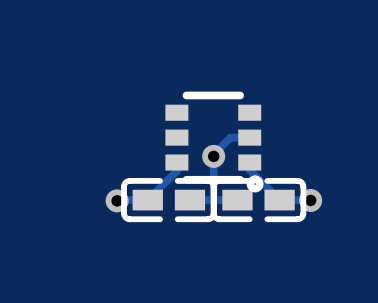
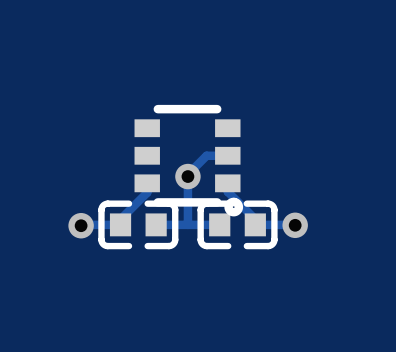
part footprint: [121, 178, 217, 223] -> [98, 200, 179, 250]
part footprint: [210, 178, 307, 223] -> [197, 200, 278, 250]

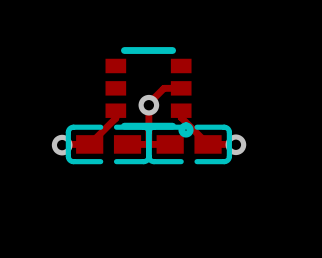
part footprint: [98, 200, 179, 250] -> [65, 124, 152, 165]
part footprint: [197, 200, 278, 250] -> [146, 124, 232, 165]

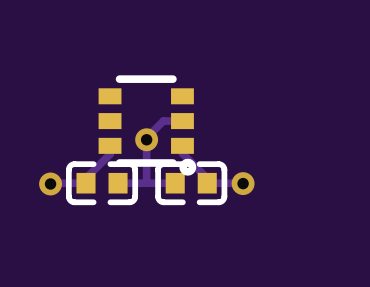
part footprint: [65, 124, 152, 165] -> [65, 161, 139, 206]
part footprint: [146, 124, 232, 165] -> [155, 161, 228, 206]

